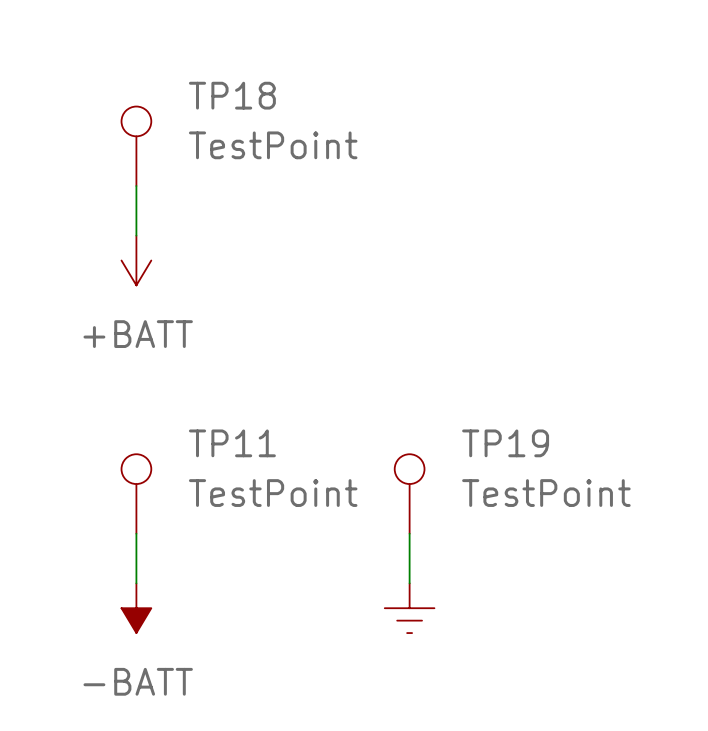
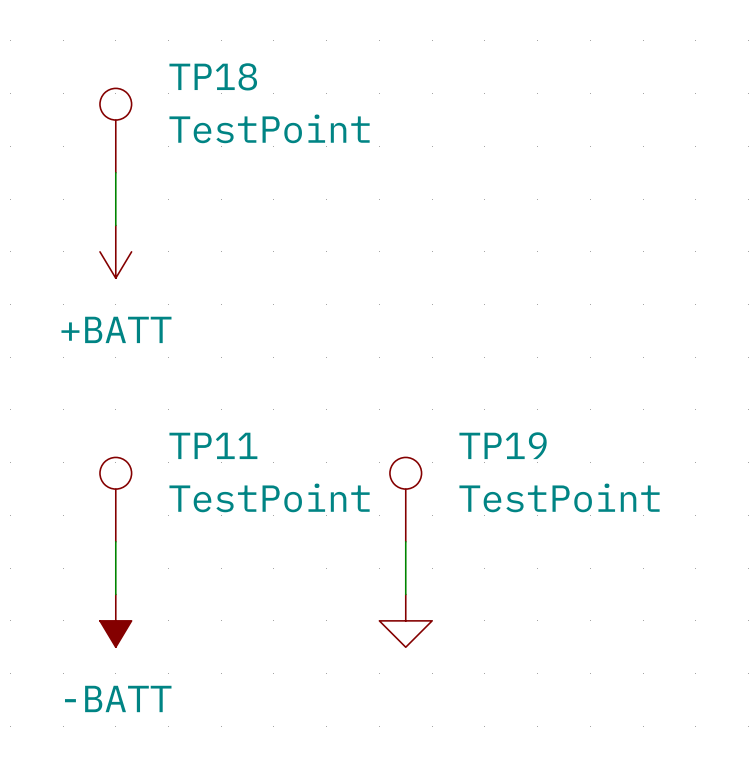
power symbol shape: [384, 583, 435, 634] -> [379, 594, 433, 648]

